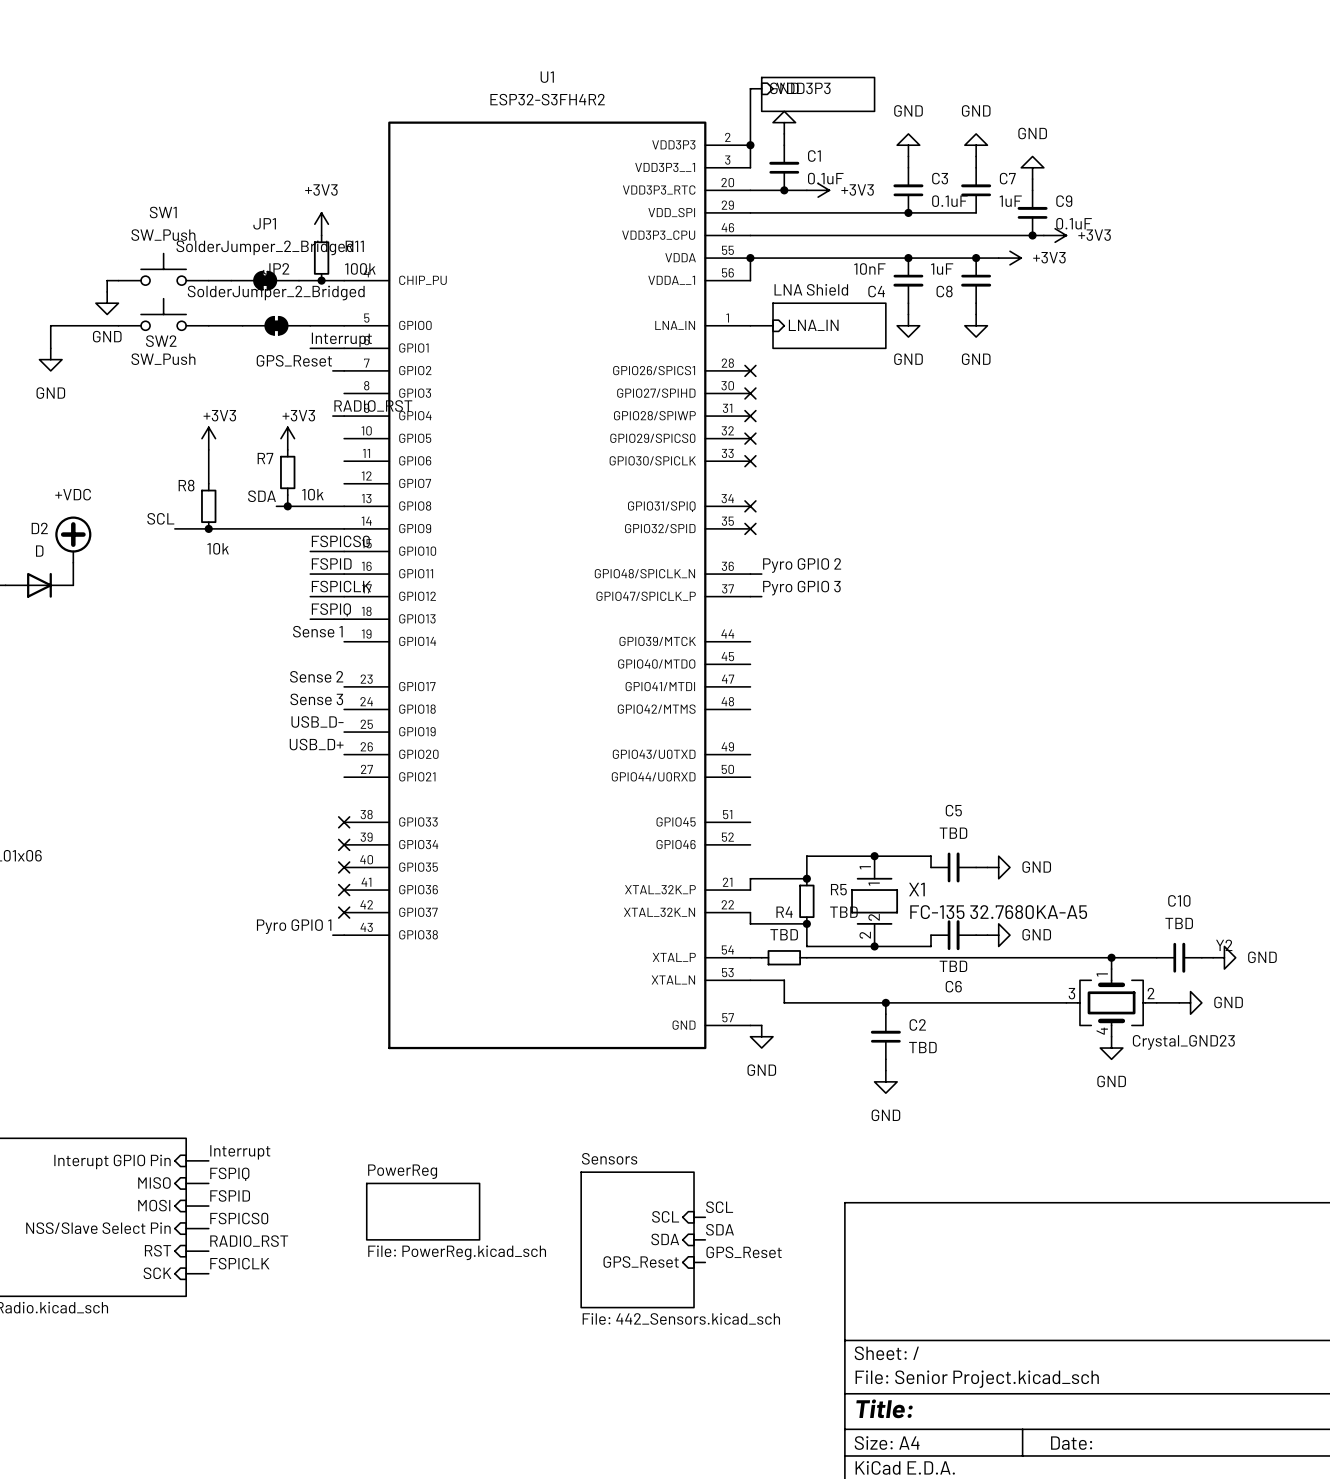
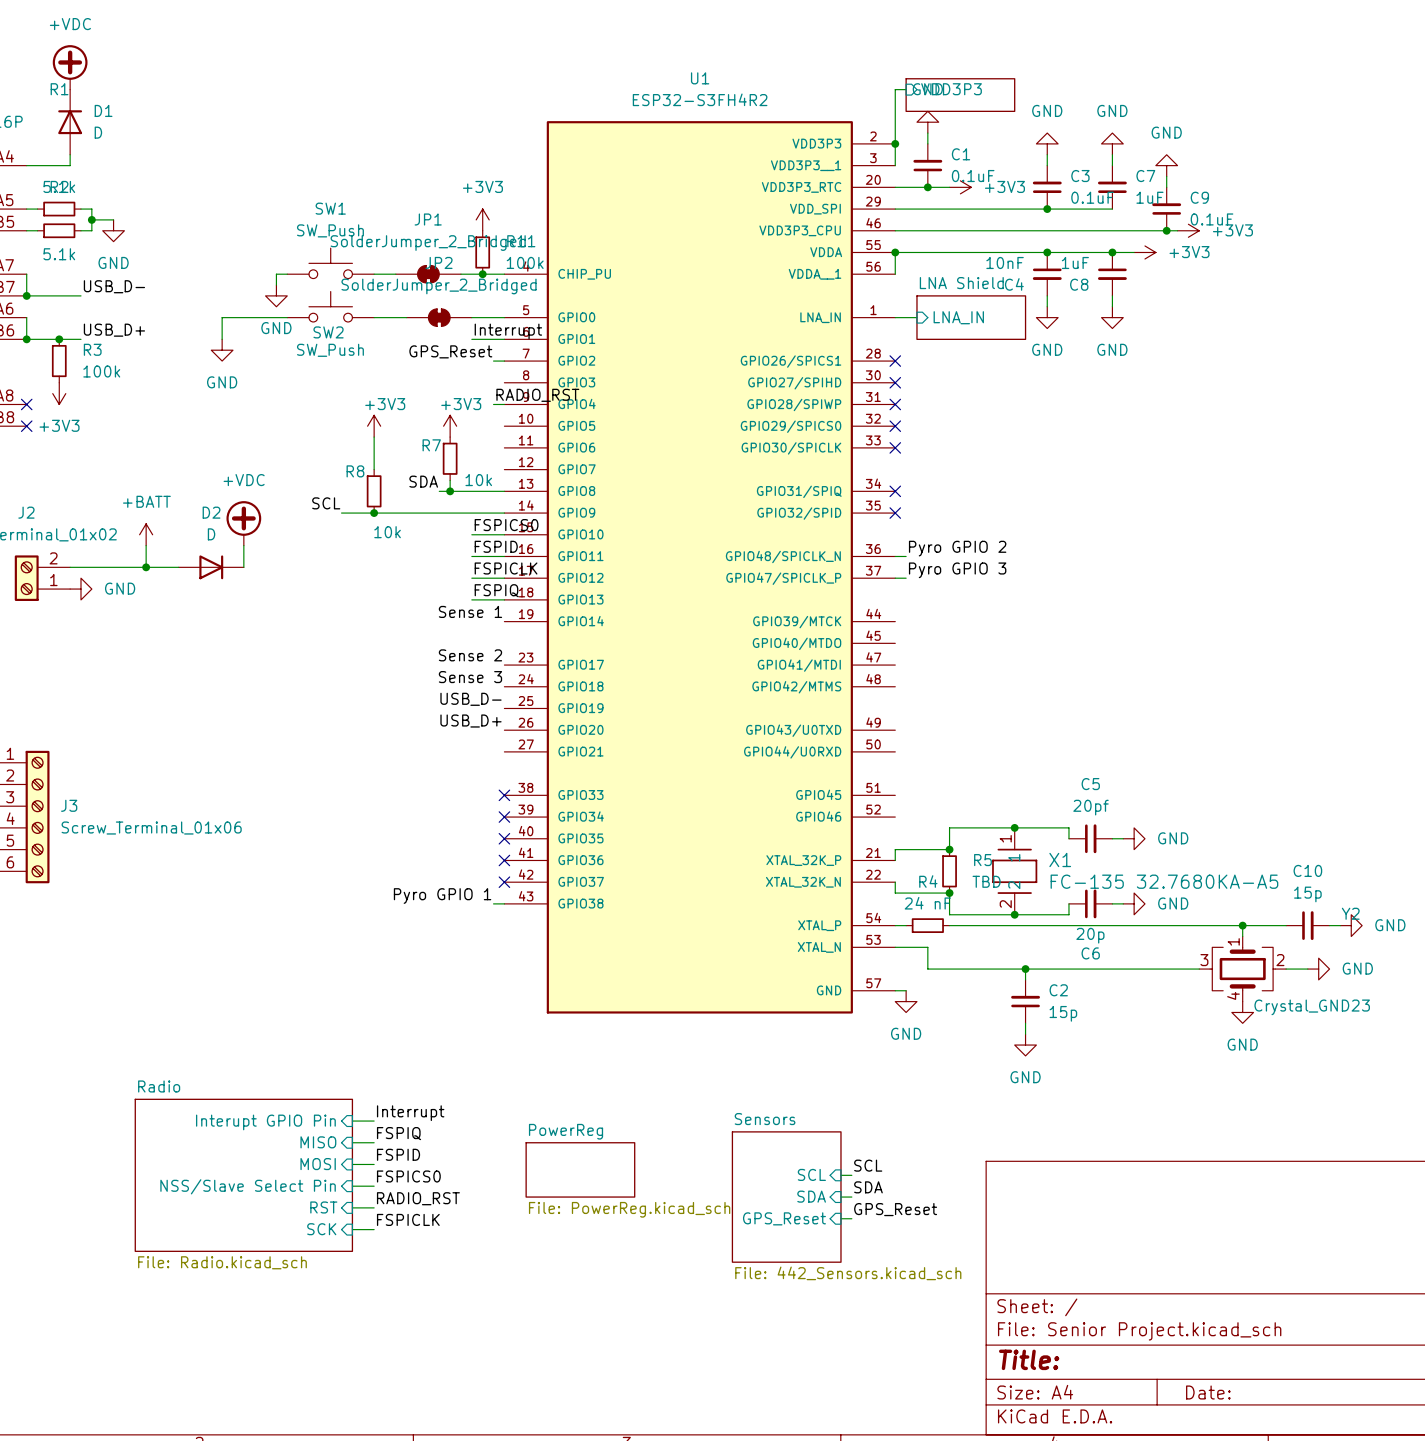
C5 value: TBD (953, 833) -> 20pf (1091, 807)
C10 value: TBD (1179, 923) -> 15p (1307, 894)
R4 value: TBD (784, 934) -> 24 nF (927, 903)
C6 value: TBD (953, 966) -> 20p (1090, 935)
C2 value: TBD (922, 1047) -> 15p (1063, 1013)

